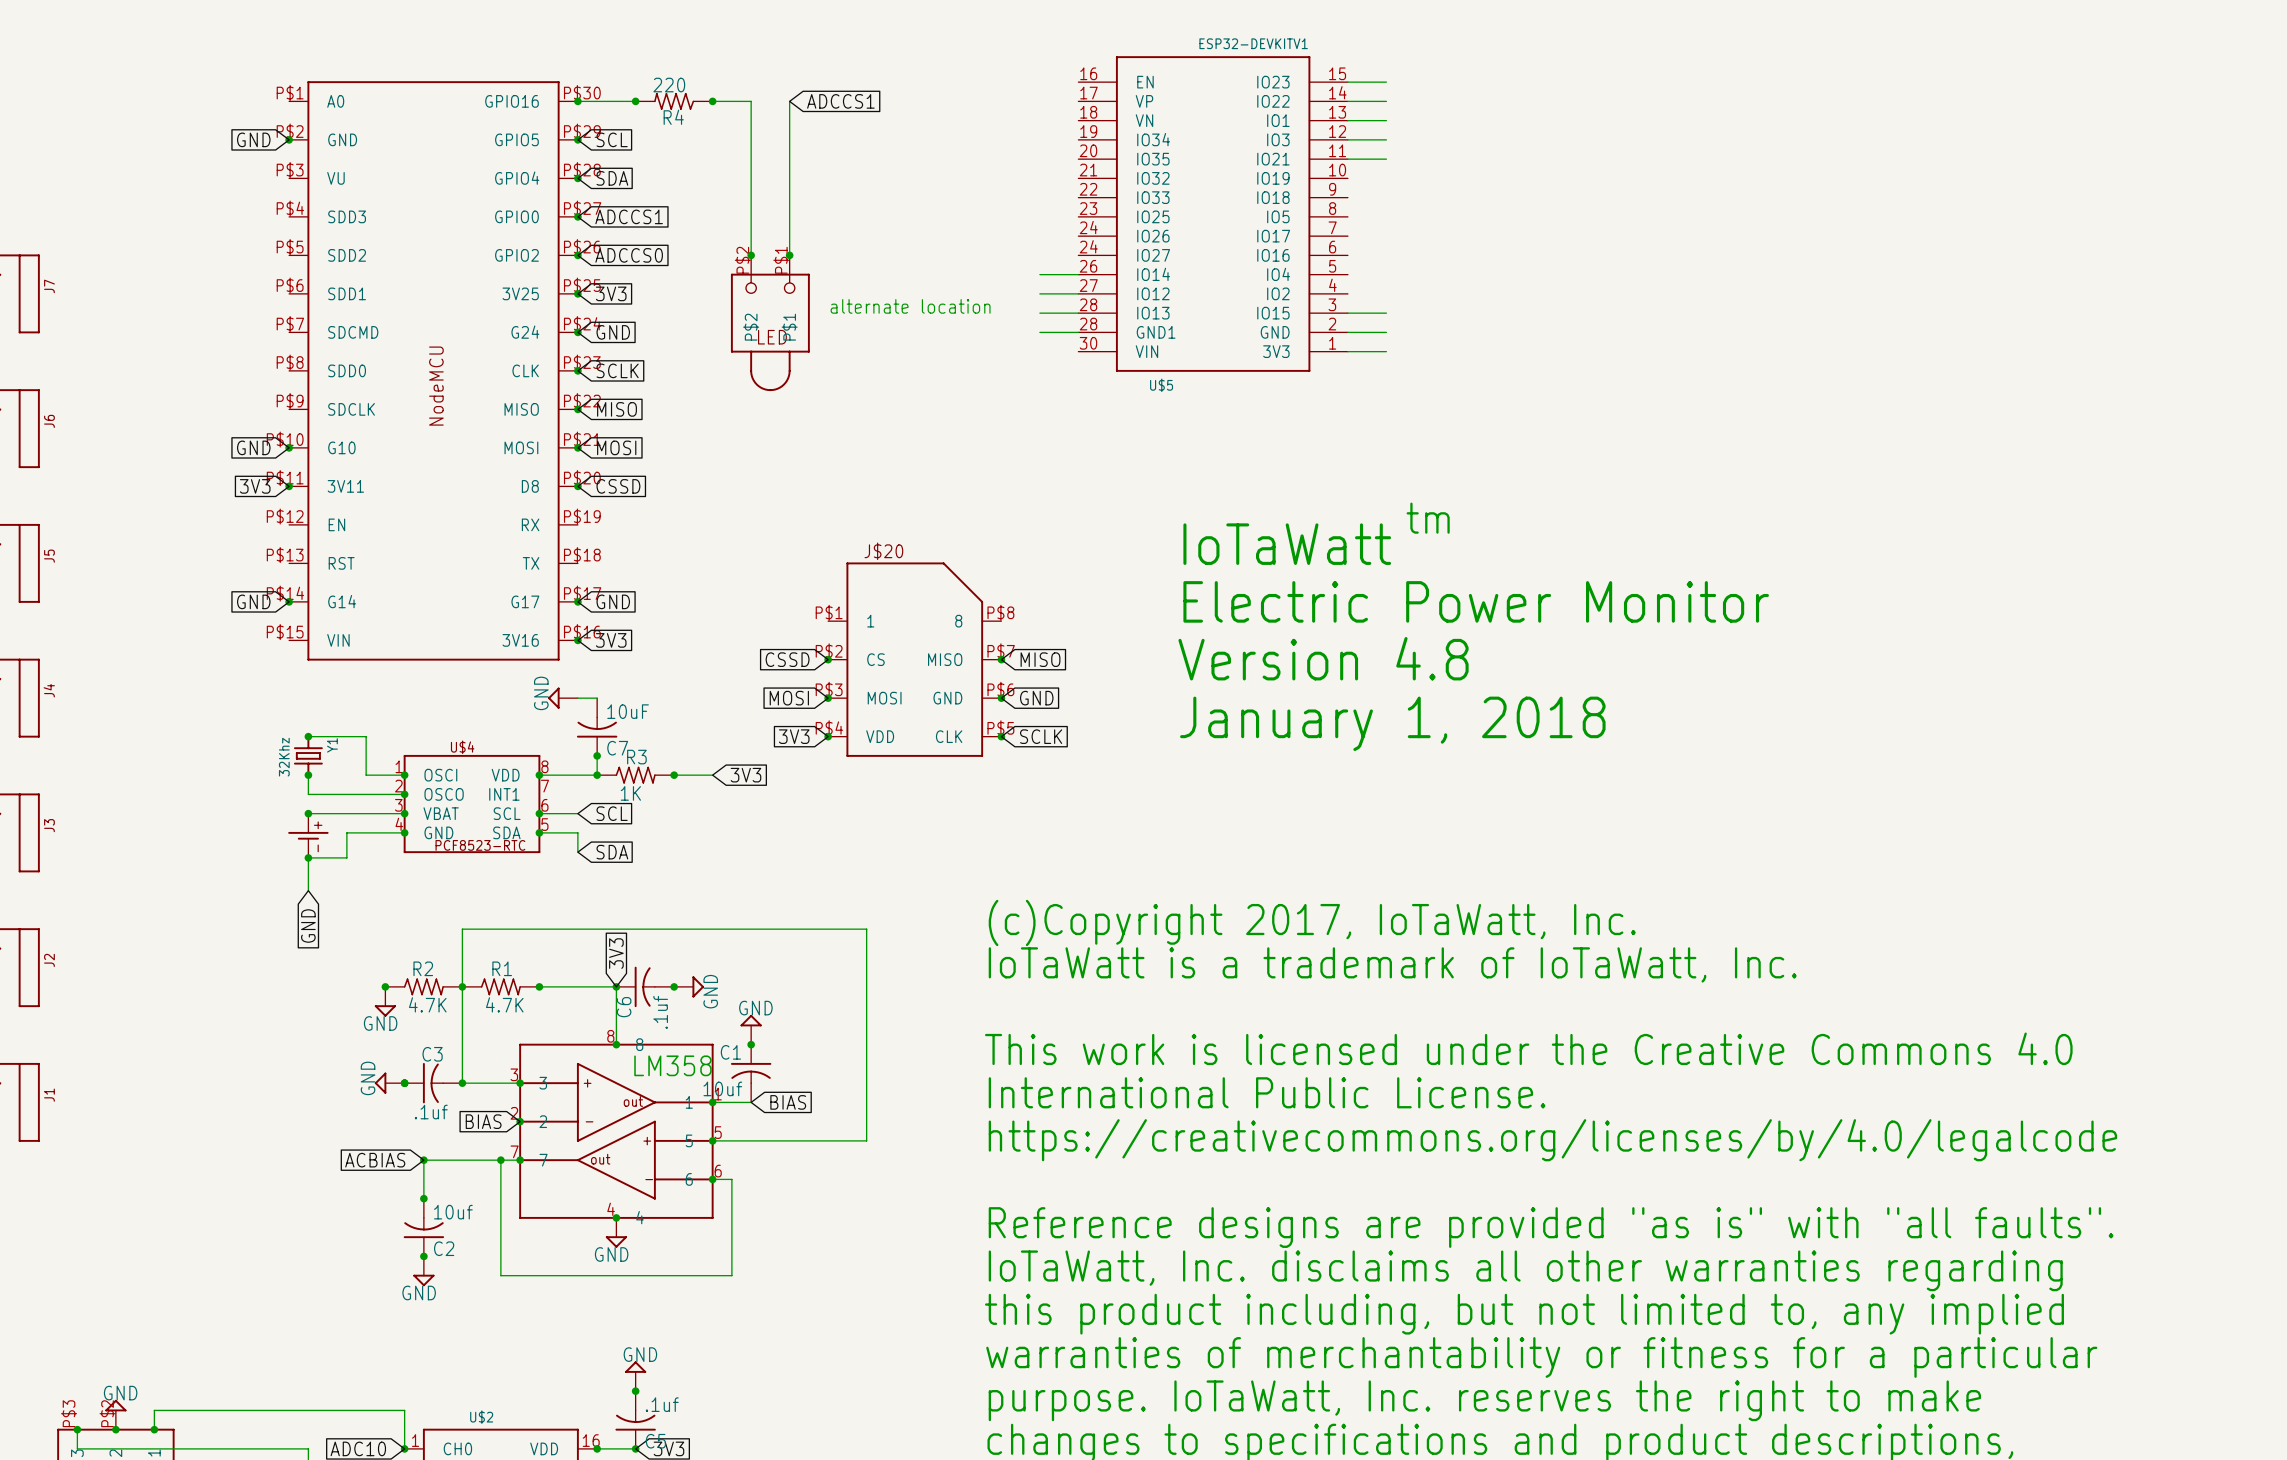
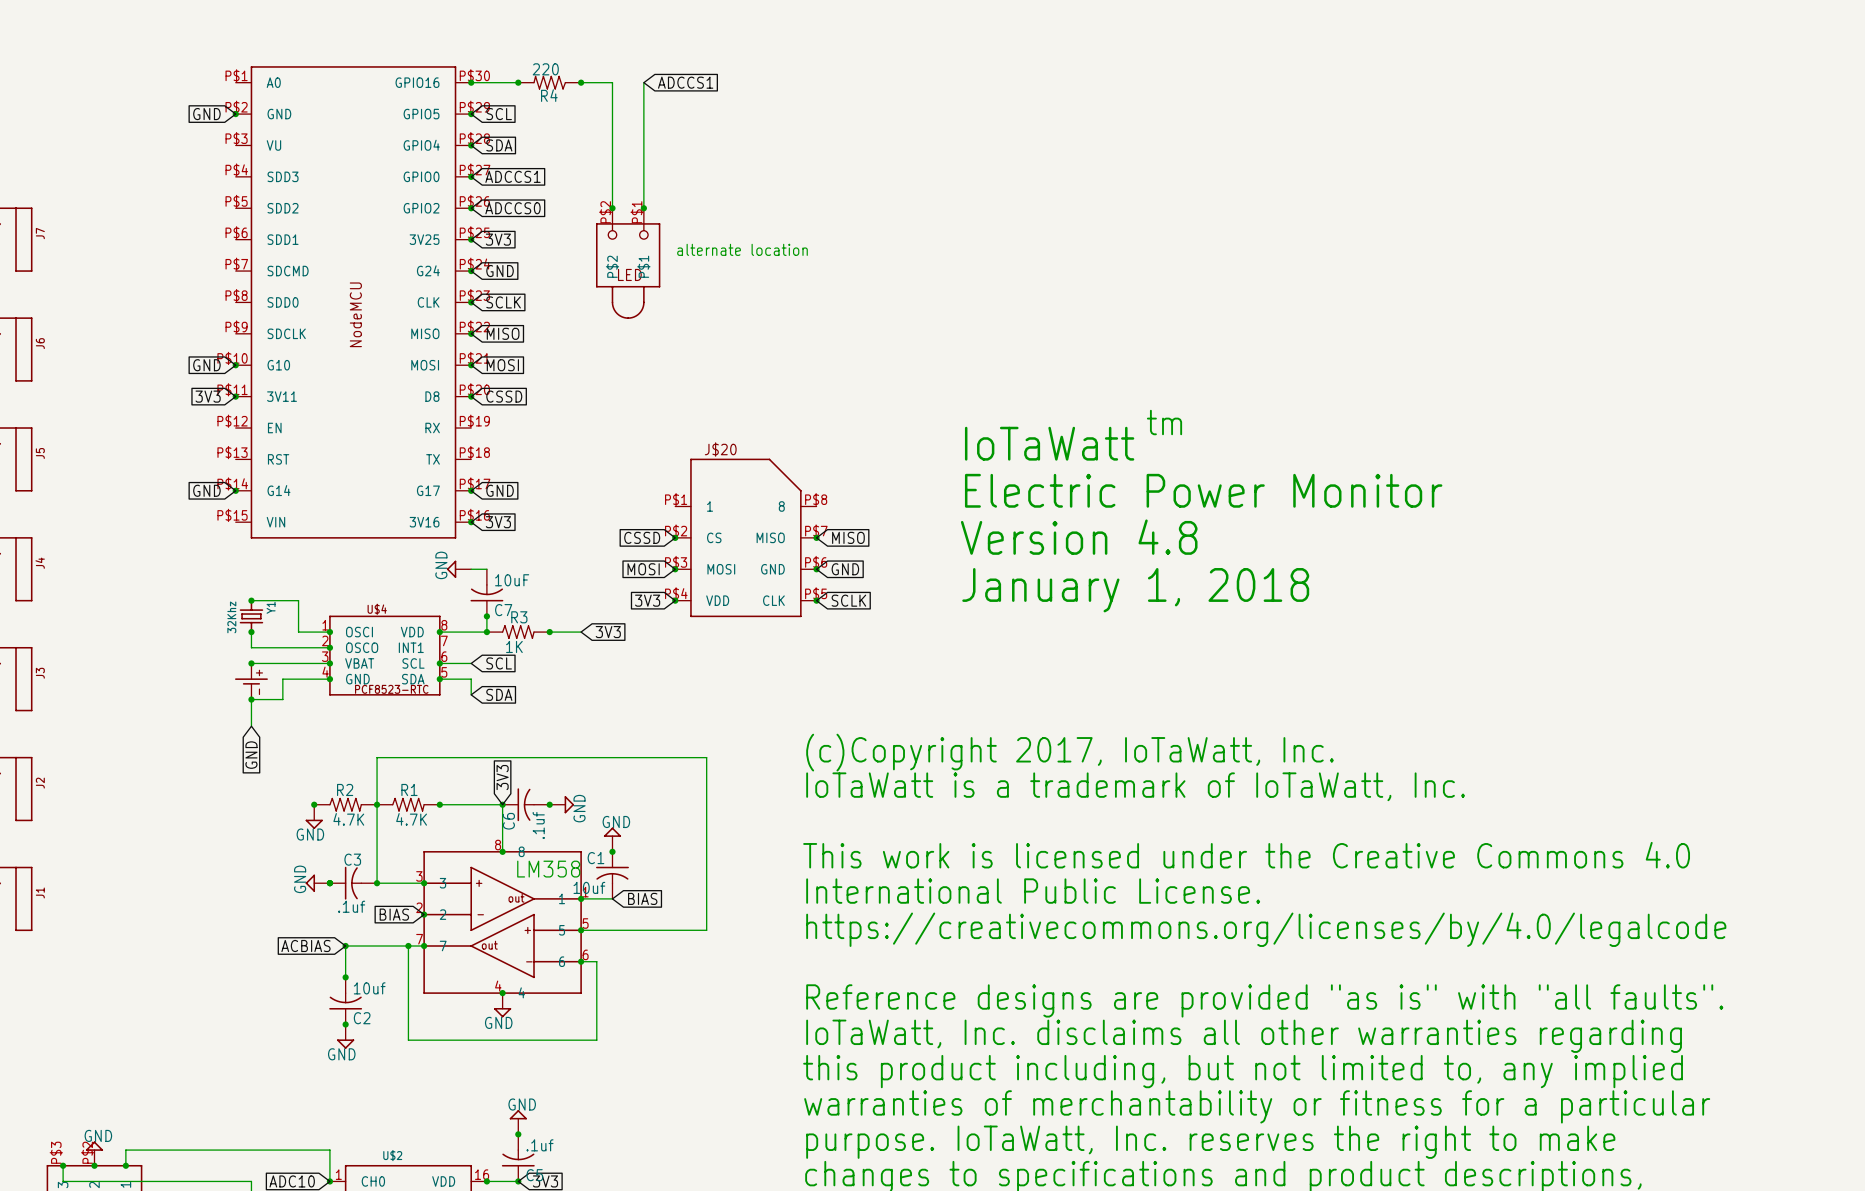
wire: (1347, 82) (1386, 82) -> none
wire: (1347, 101) (1386, 101) -> none
wire: (1347, 120) (1386, 120) -> none
wire: (1347, 139) (1386, 139) -> none
wire: (1347, 159) (1386, 159) -> none
U$5: (1213, 214) -> none
wire: (1039, 274) (1078, 274) -> none
wire: (1039, 293) (1078, 293) -> none
wire: (1039, 313) (1078, 313) -> none
wire: (1347, 313) (1386, 313) -> none
wire: (1039, 332) (1078, 332) -> none
wire: (1347, 332) (1386, 332) -> none
wire: (1347, 351) (1386, 351) -> none

